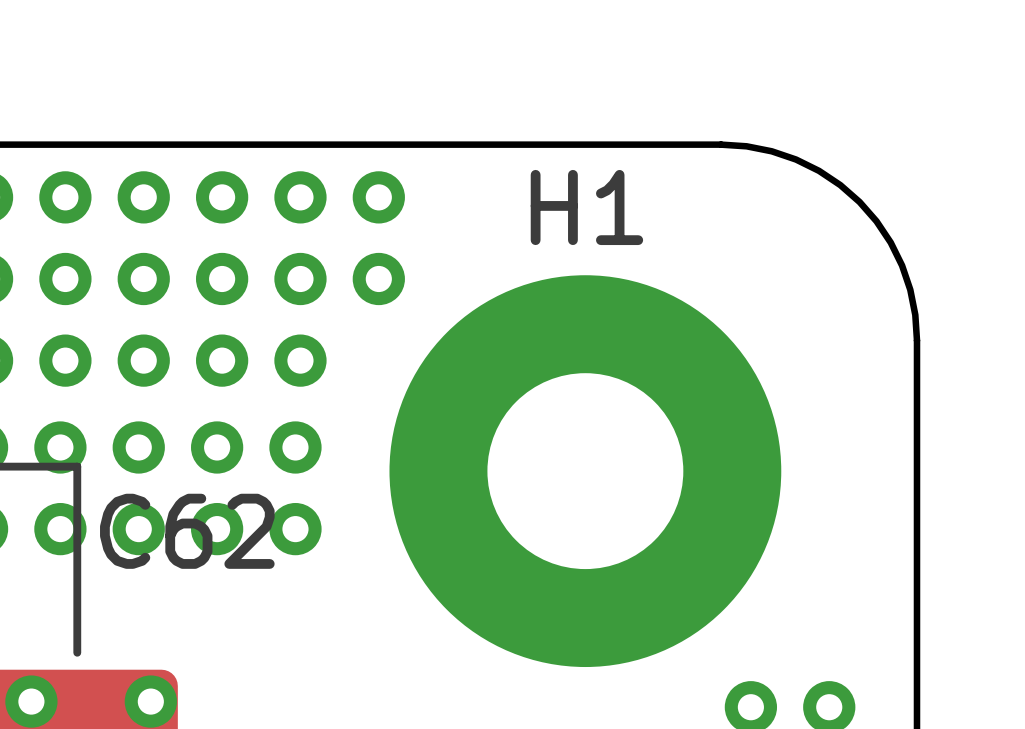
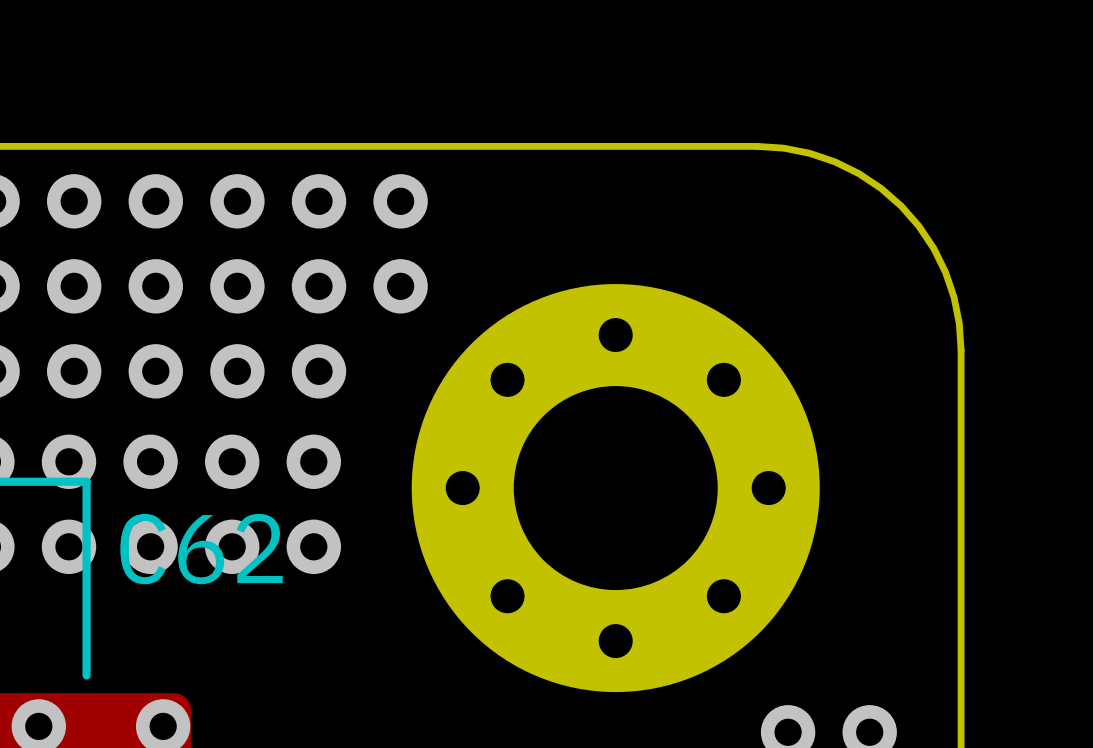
H1: (585, 471) -> none
part: none -> (615, 488)

